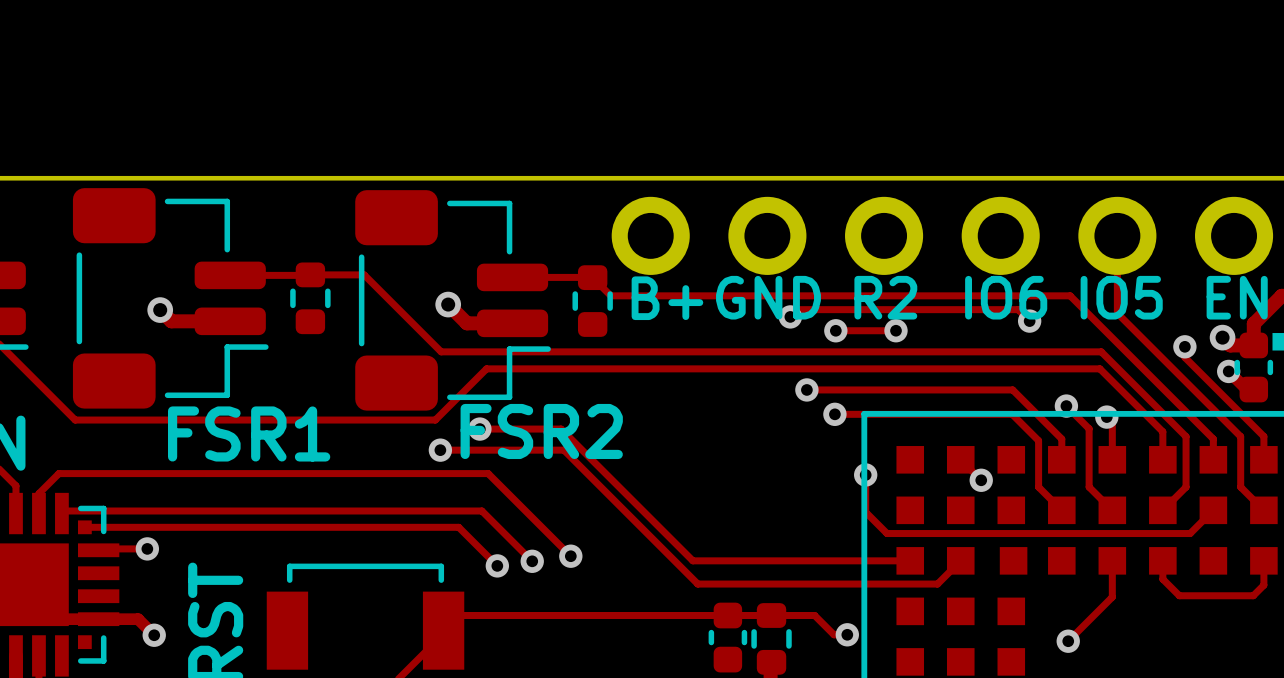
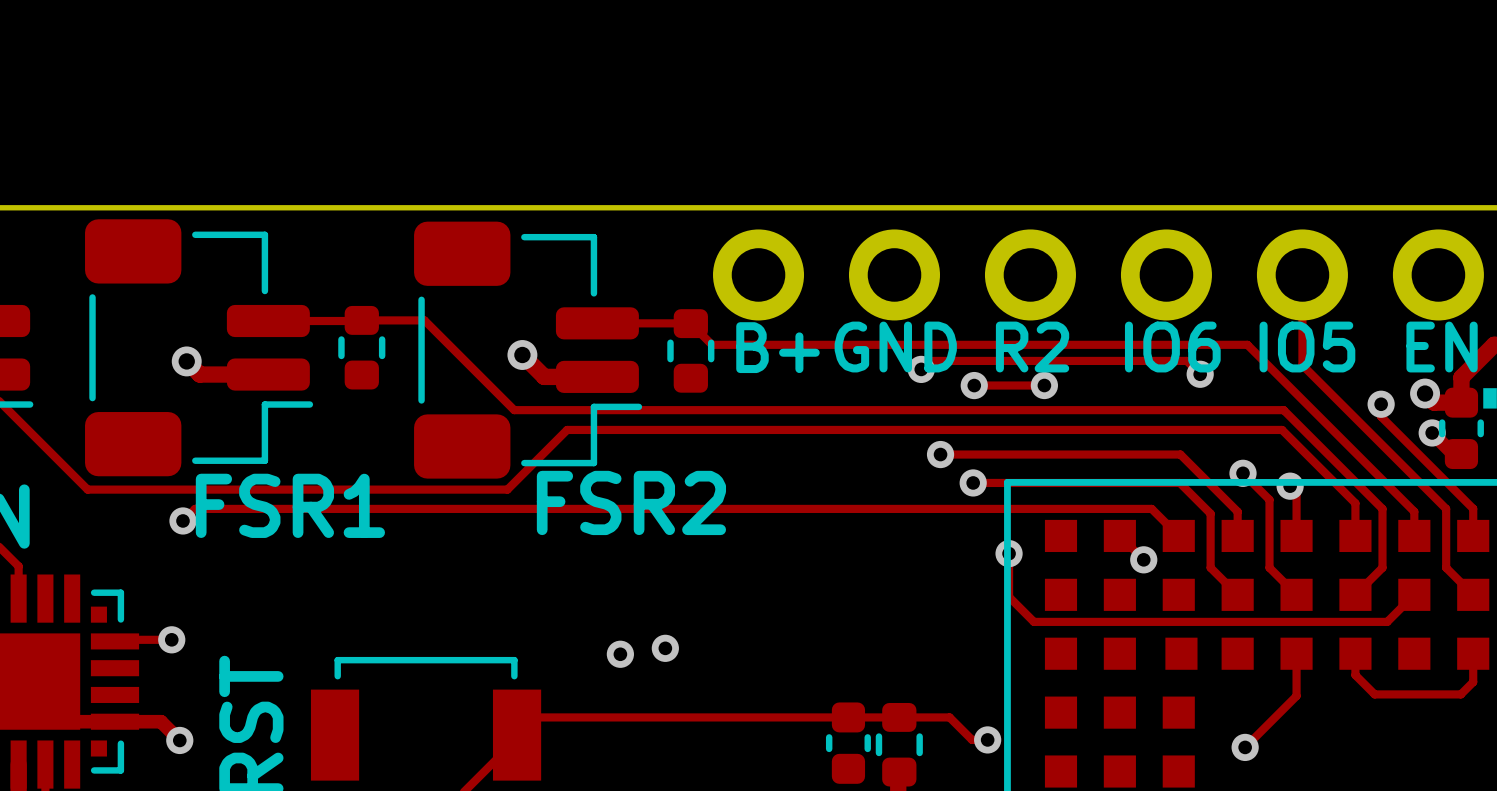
track: (479, 429) (561, 429) (692, 560) (910, 560) -> none
via: (479, 429) -> none
track: none -> (182, 520) (195, 508) (1151, 508) (1178, 535)
via: none -> (182, 520)
track: (440, 450) (563, 450) (697, 584) (937, 584) (960, 560) -> none
via: (440, 450) -> none
track: (38, 513) (38, 493) (58, 473) (488, 473) (570, 556) -> none
track: (61, 513) (64, 511) (481, 511) (532, 561) -> none
track: (84, 527) (458, 527) (497, 565) -> none
via: (497, 565) -> none

